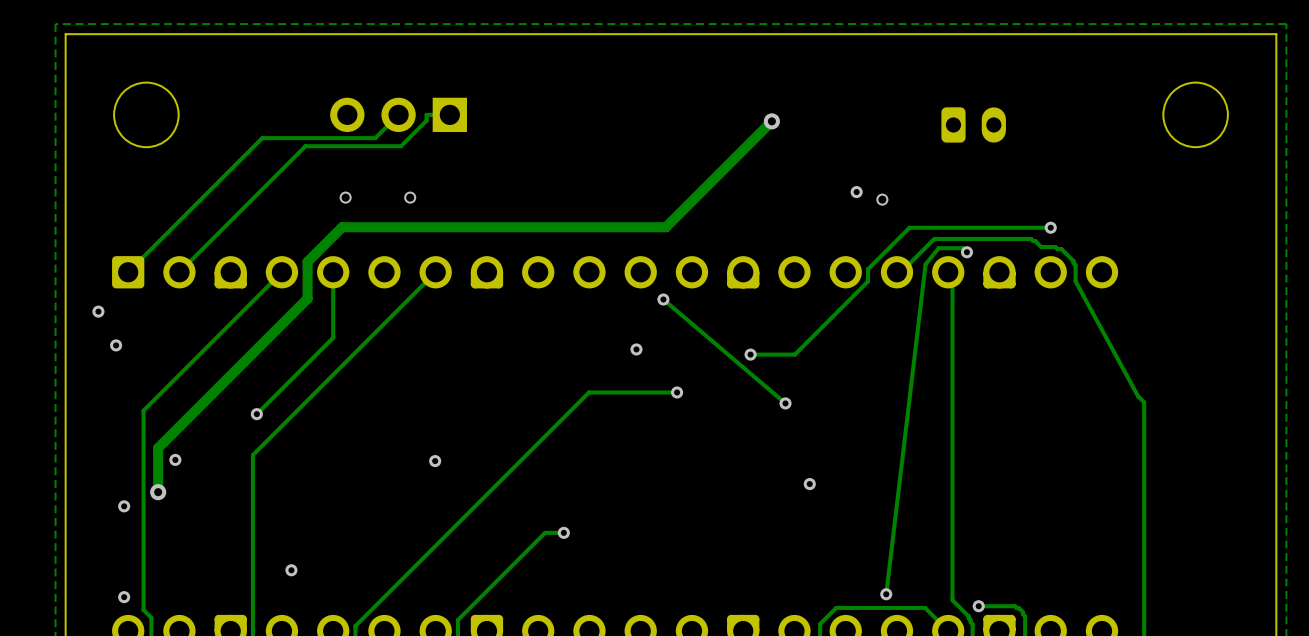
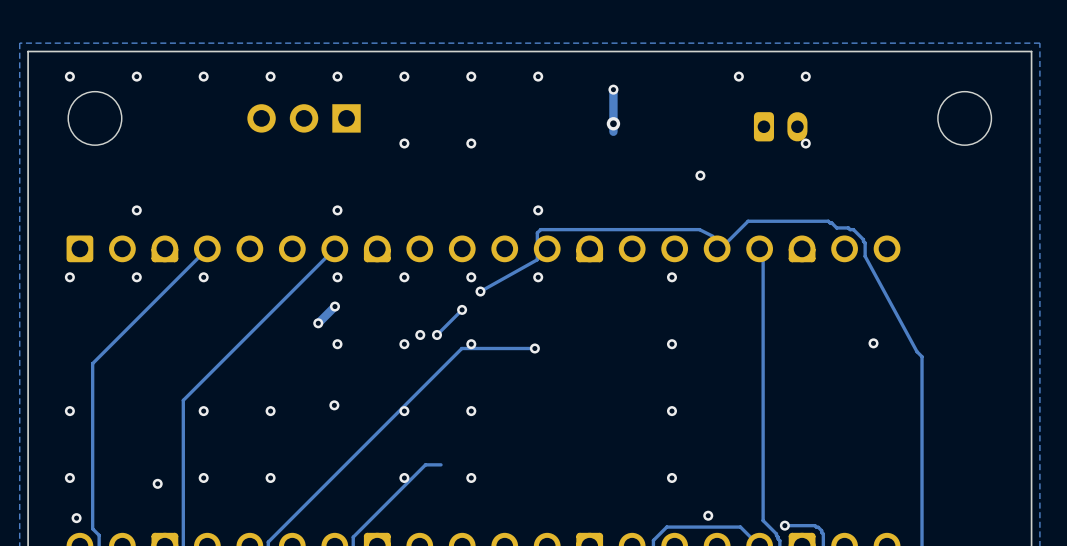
via: none -> (69, 76)
via: none -> (136, 76)
via: none -> (203, 76)
via: none -> (270, 76)
via: none -> (337, 76)
via: none -> (404, 76)
via: none -> (471, 76)
via: none -> (538, 76)
via: none -> (738, 76)
via: none -> (805, 76)
track: none -> (613, 89) (613, 131)
via: none -> (613, 89)
track: (398, 114) (375, 138) (262, 138) (128, 272) -> none
track: (449, 114) (426, 114) (426, 120) (401, 146) (305, 146) (179, 272) -> none
track: (771, 121) (666, 227) (342, 227) (307, 261) (307, 298) (158, 448) (158, 492) -> none
via: none -> (404, 143)
via: none -> (471, 143)
via: none -> (805, 143)
via position: (856, 192) -> (700, 175)
via: (345, 197) -> none
via: (410, 197) -> none
via: (882, 199) -> none
via: none -> (136, 210)
via: none -> (337, 210)
via: none -> (538, 210)
track: (1050, 227) (909, 227) (867, 269) (867, 281) (794, 354) (750, 354) -> none
via: (1050, 227) -> none
track: (966, 252) (962, 248) (938, 248) (925, 264) (886, 594) -> none
via: (966, 252) -> none
track: none -> (712, 236) (699, 229) (540, 229) (537, 232) (537, 259) (480, 291)
track: (333, 272) (333, 337) (256, 414) -> none
track: (663, 299) (785, 403) -> none
via position: (663, 299) -> (538, 277)
via: none -> (136, 277)
via: none -> (203, 277)
via: none -> (337, 277)
via: none -> (404, 277)
via: none -> (471, 277)
via: none -> (671, 277)
via position: (98, 311) -> (69, 277)
via: none -> (480, 291)
track: none -> (334, 306) (318, 323)
via: none -> (334, 306)
via: (116, 345) -> none
track: none -> (462, 309) (437, 334)
via: none -> (462, 309)
via: (636, 349) -> none
via: (750, 354) -> none
via: none -> (318, 323)
via: none -> (420, 334)
via: none -> (437, 334)
via: none -> (873, 343)
via: none -> (337, 344)
via: none -> (404, 344)
via: none -> (471, 344)
via: none -> (671, 344)
via: (785, 403) -> none
via: (256, 414) -> none
via: (175, 459) -> none
via: none -> (69, 411)
via: none -> (203, 411)
via: none -> (270, 411)
via: none -> (404, 411)
via: none -> (471, 411)
via: none -> (671, 411)
via: (809, 484) -> none
via: (158, 492) -> none
via: (124, 506) -> none
via: (563, 532) -> none
via: none -> (69, 477)
via: none -> (270, 477)
via: none -> (404, 477)
via: none -> (471, 477)
via: none -> (671, 477)
via: none -> (157, 483)
via position: (291, 570) -> (203, 477)

